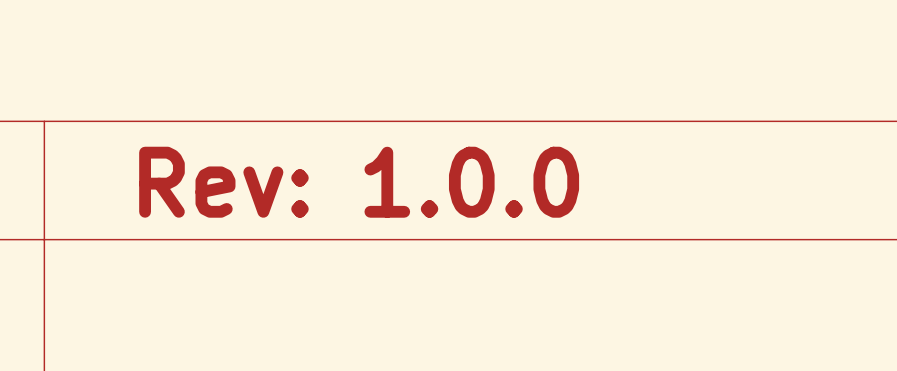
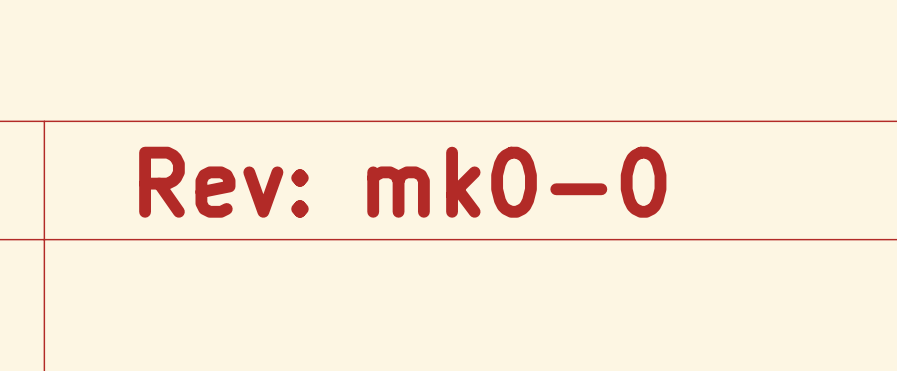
title block: Rev: 1.0.0 (359, 182) -> Rev: mk0-0 (402, 182)

